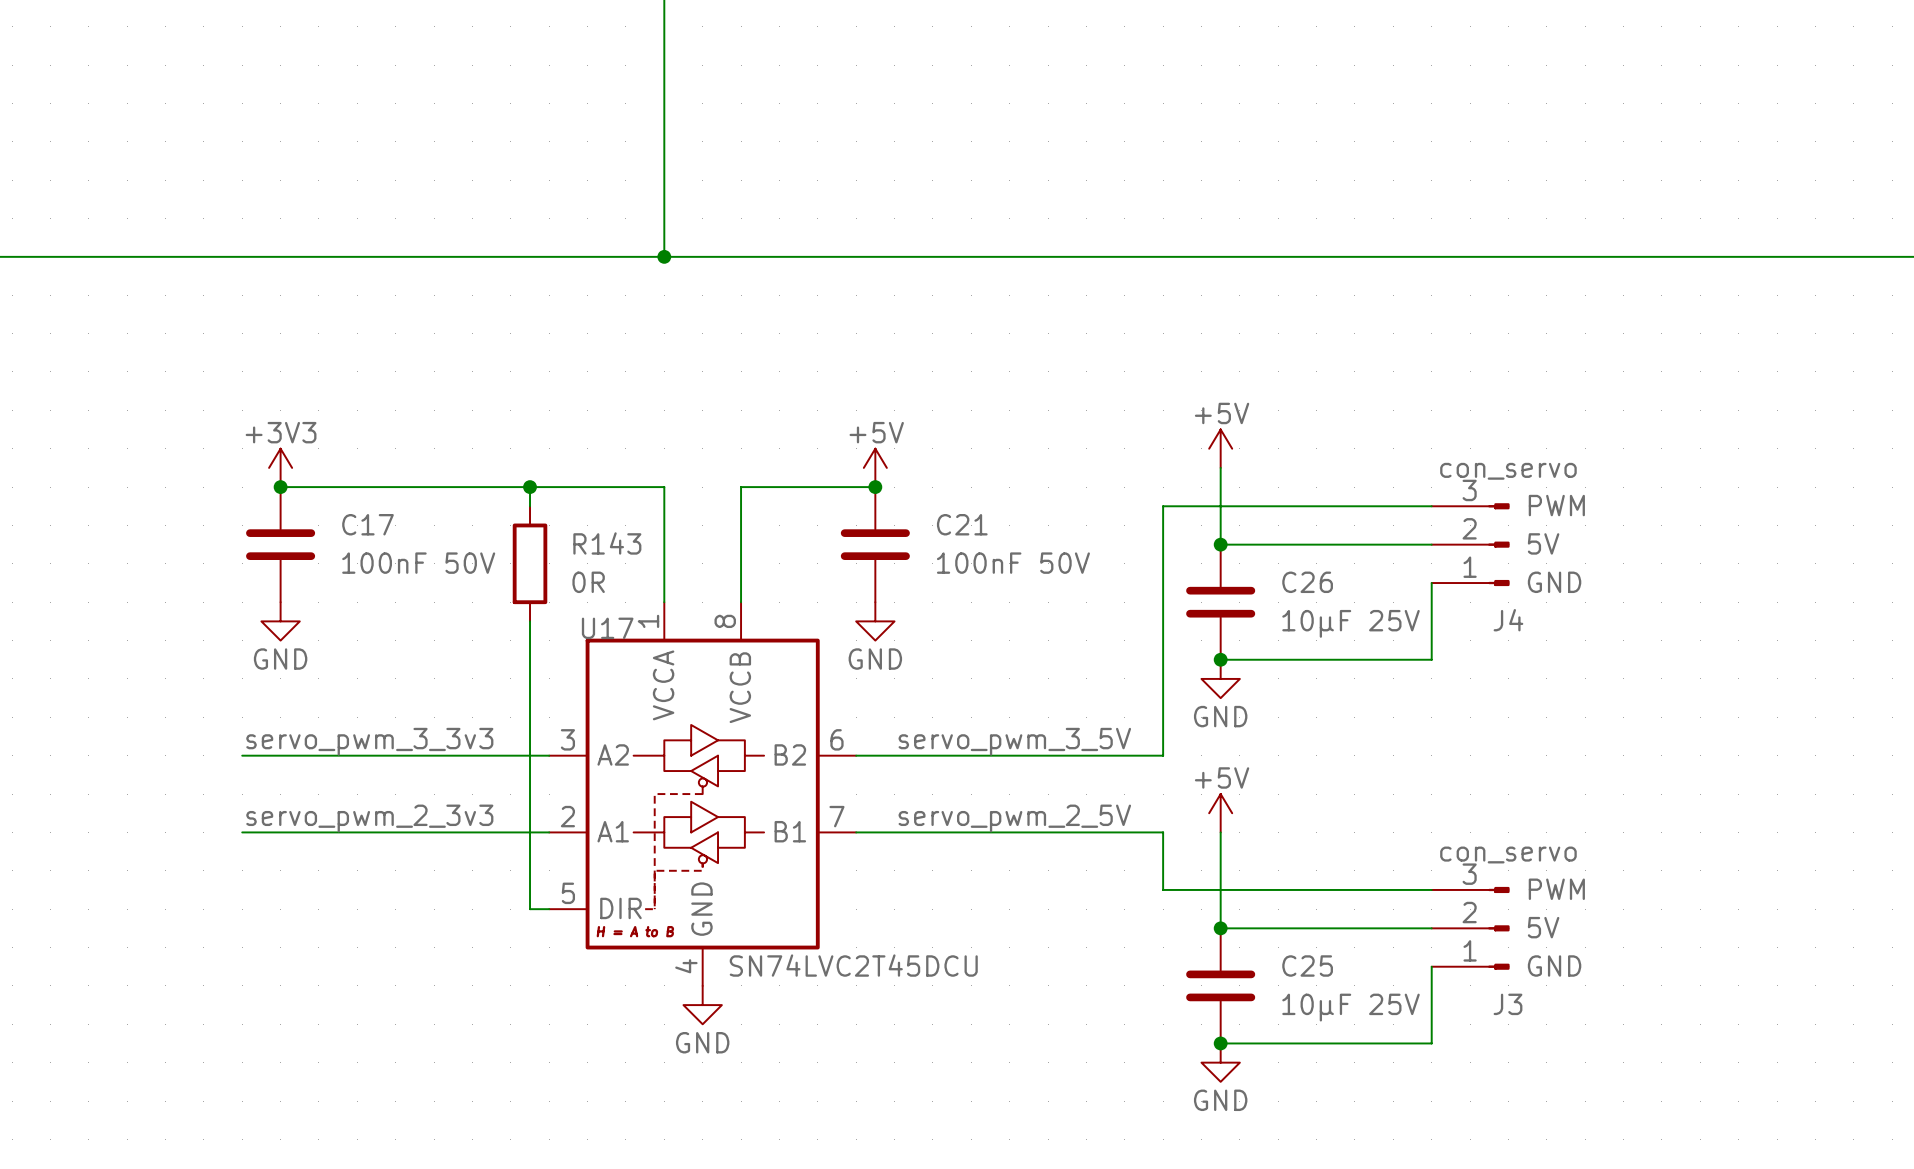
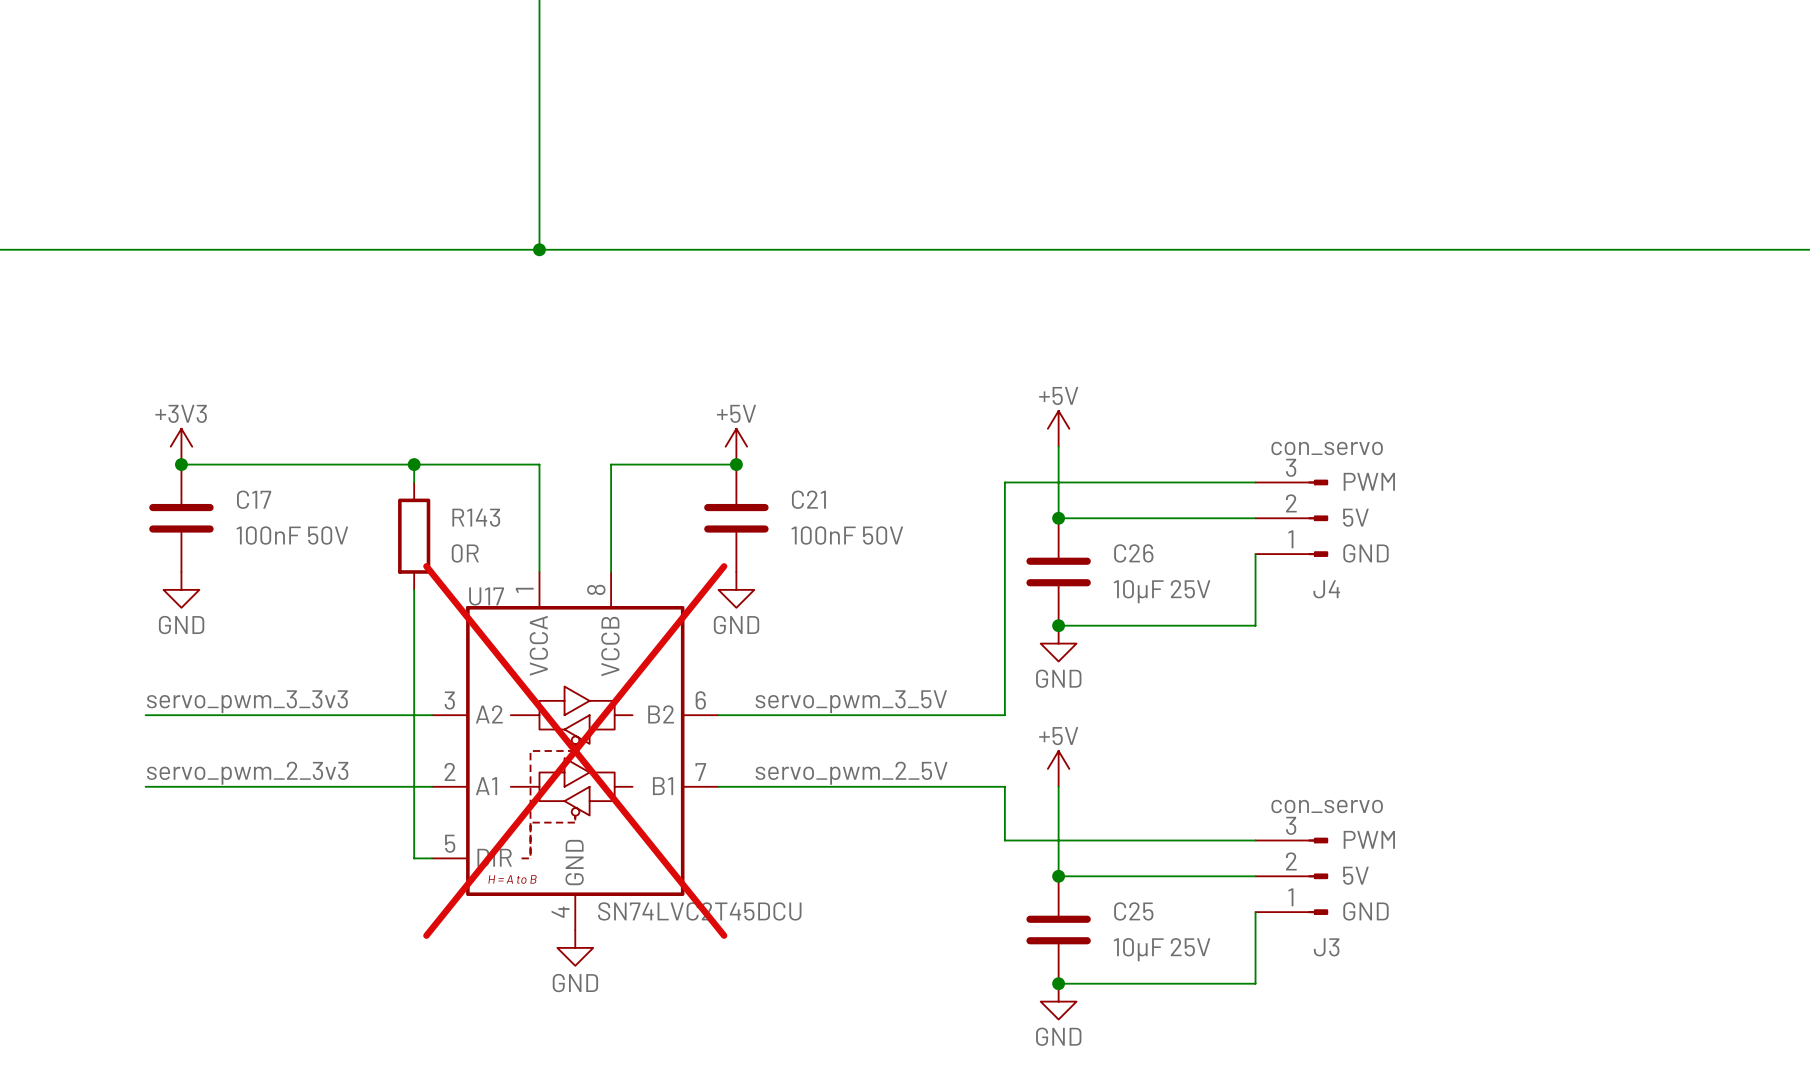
U17 do-not-place cross: none -> (575, 751)

